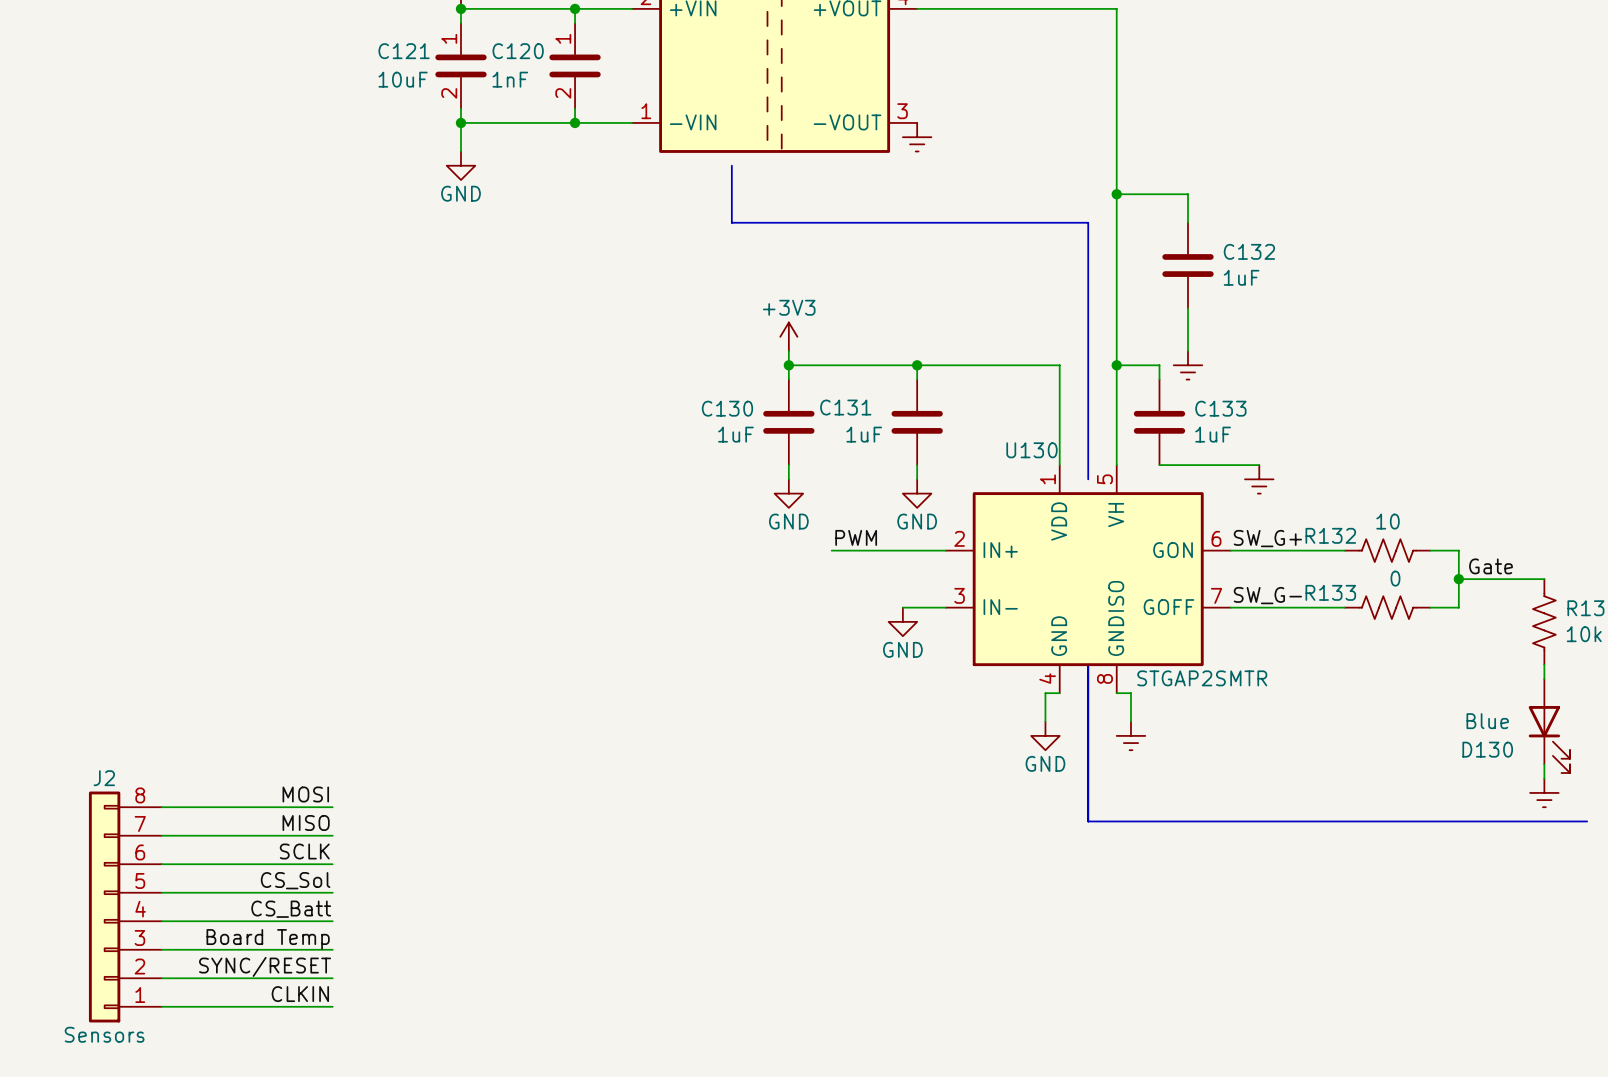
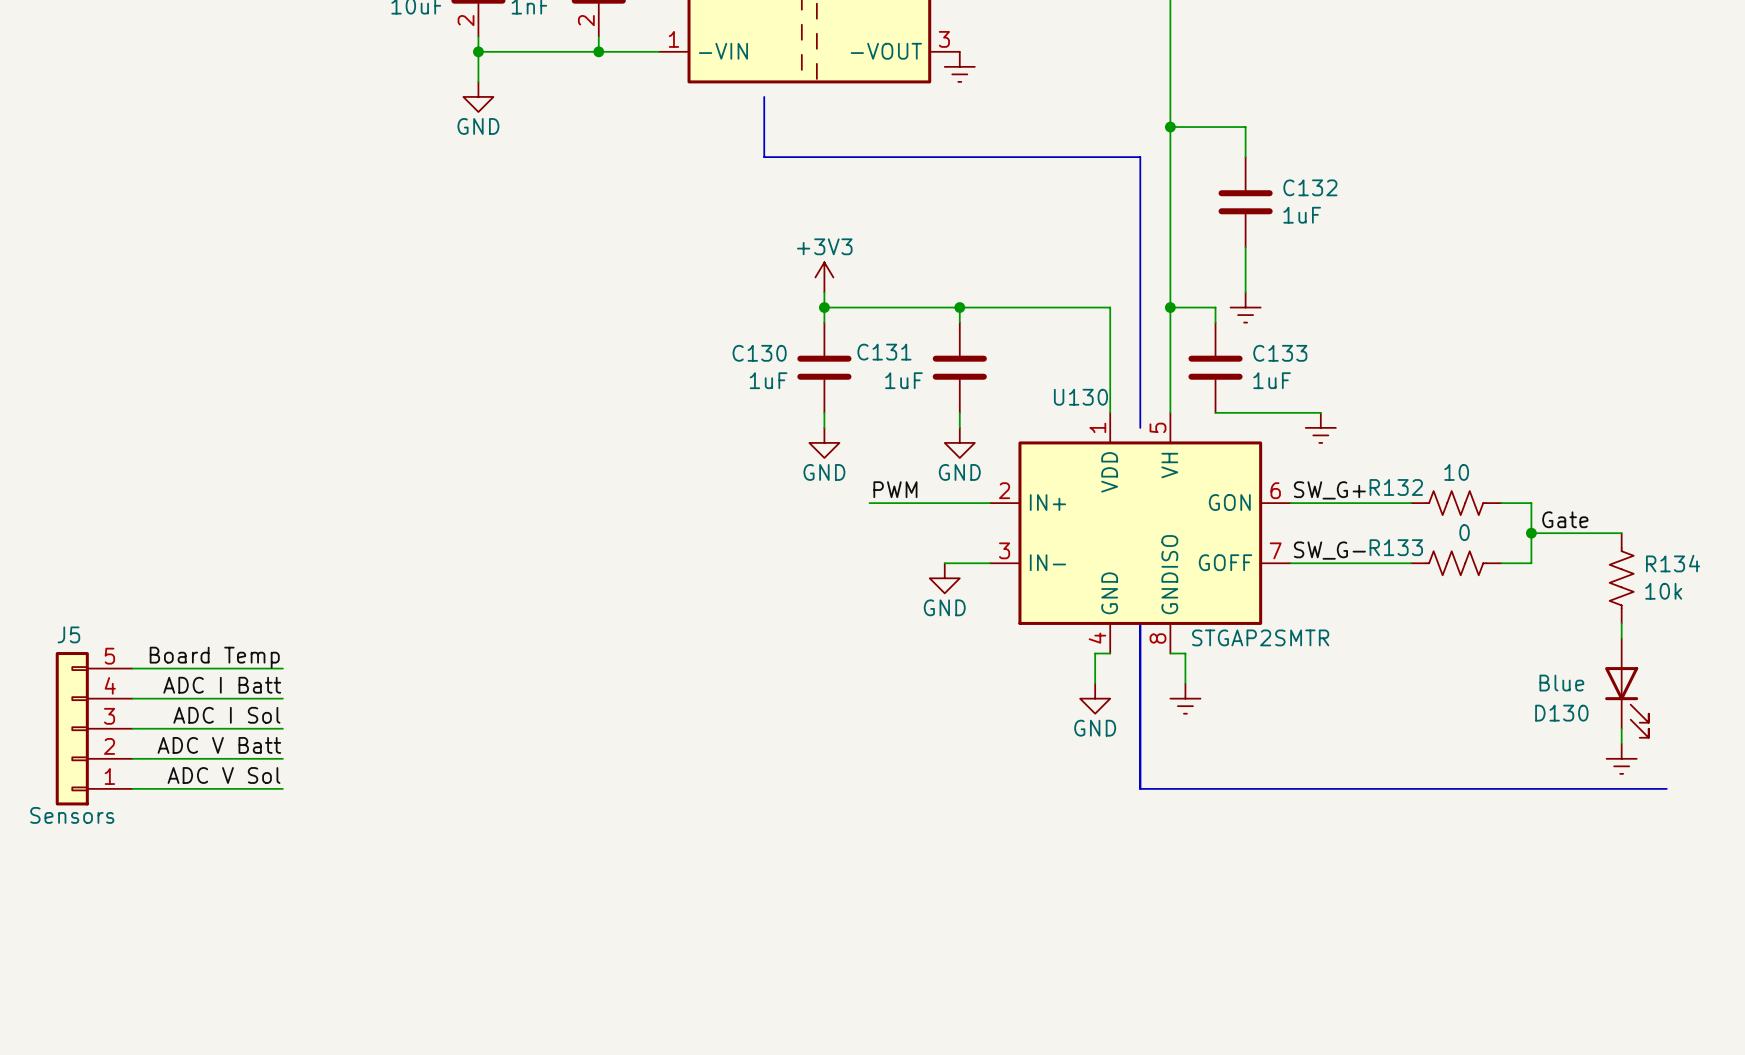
wire: none -> (132, 668) (282, 668)
label: none -> ADC I Batt (222, 685)
wire: none -> (132, 698) (282, 698)
label: none -> ADC I Sol (226, 715)
J5: none -> Sensors (94, 728)
wire: none -> (132, 728) (282, 728)
label: none -> ADC V Batt (219, 745)
wire: none -> (132, 758) (282, 758)
label: MOSI (305, 794) -> none
wire: (161, 807) (332, 807) -> none
label: none -> ADC V Sol (224, 775)
wire: none -> (132, 788) (282, 788)
label: MISO (306, 823) -> none
wire: (161, 835) (332, 835) -> none
label: SCLK (304, 851) -> none
wire: (161, 864) (332, 864) -> none
label: CS_Sol (295, 880) -> none
wire: (161, 892) (332, 892) -> none
J2: Sensors (125, 907) -> none
label: CS_Batt (291, 909) -> none
wire: (161, 921) (332, 921) -> none
label position: Board Temp (268, 939) -> Board Temp (214, 657)
wire: (161, 949) (332, 949) -> none
label: SYNC/RESET (265, 966) -> none
wire: (161, 978) (332, 978) -> none
label: CLKIN (300, 994) -> none
wire: (161, 1006) (332, 1006) -> none

